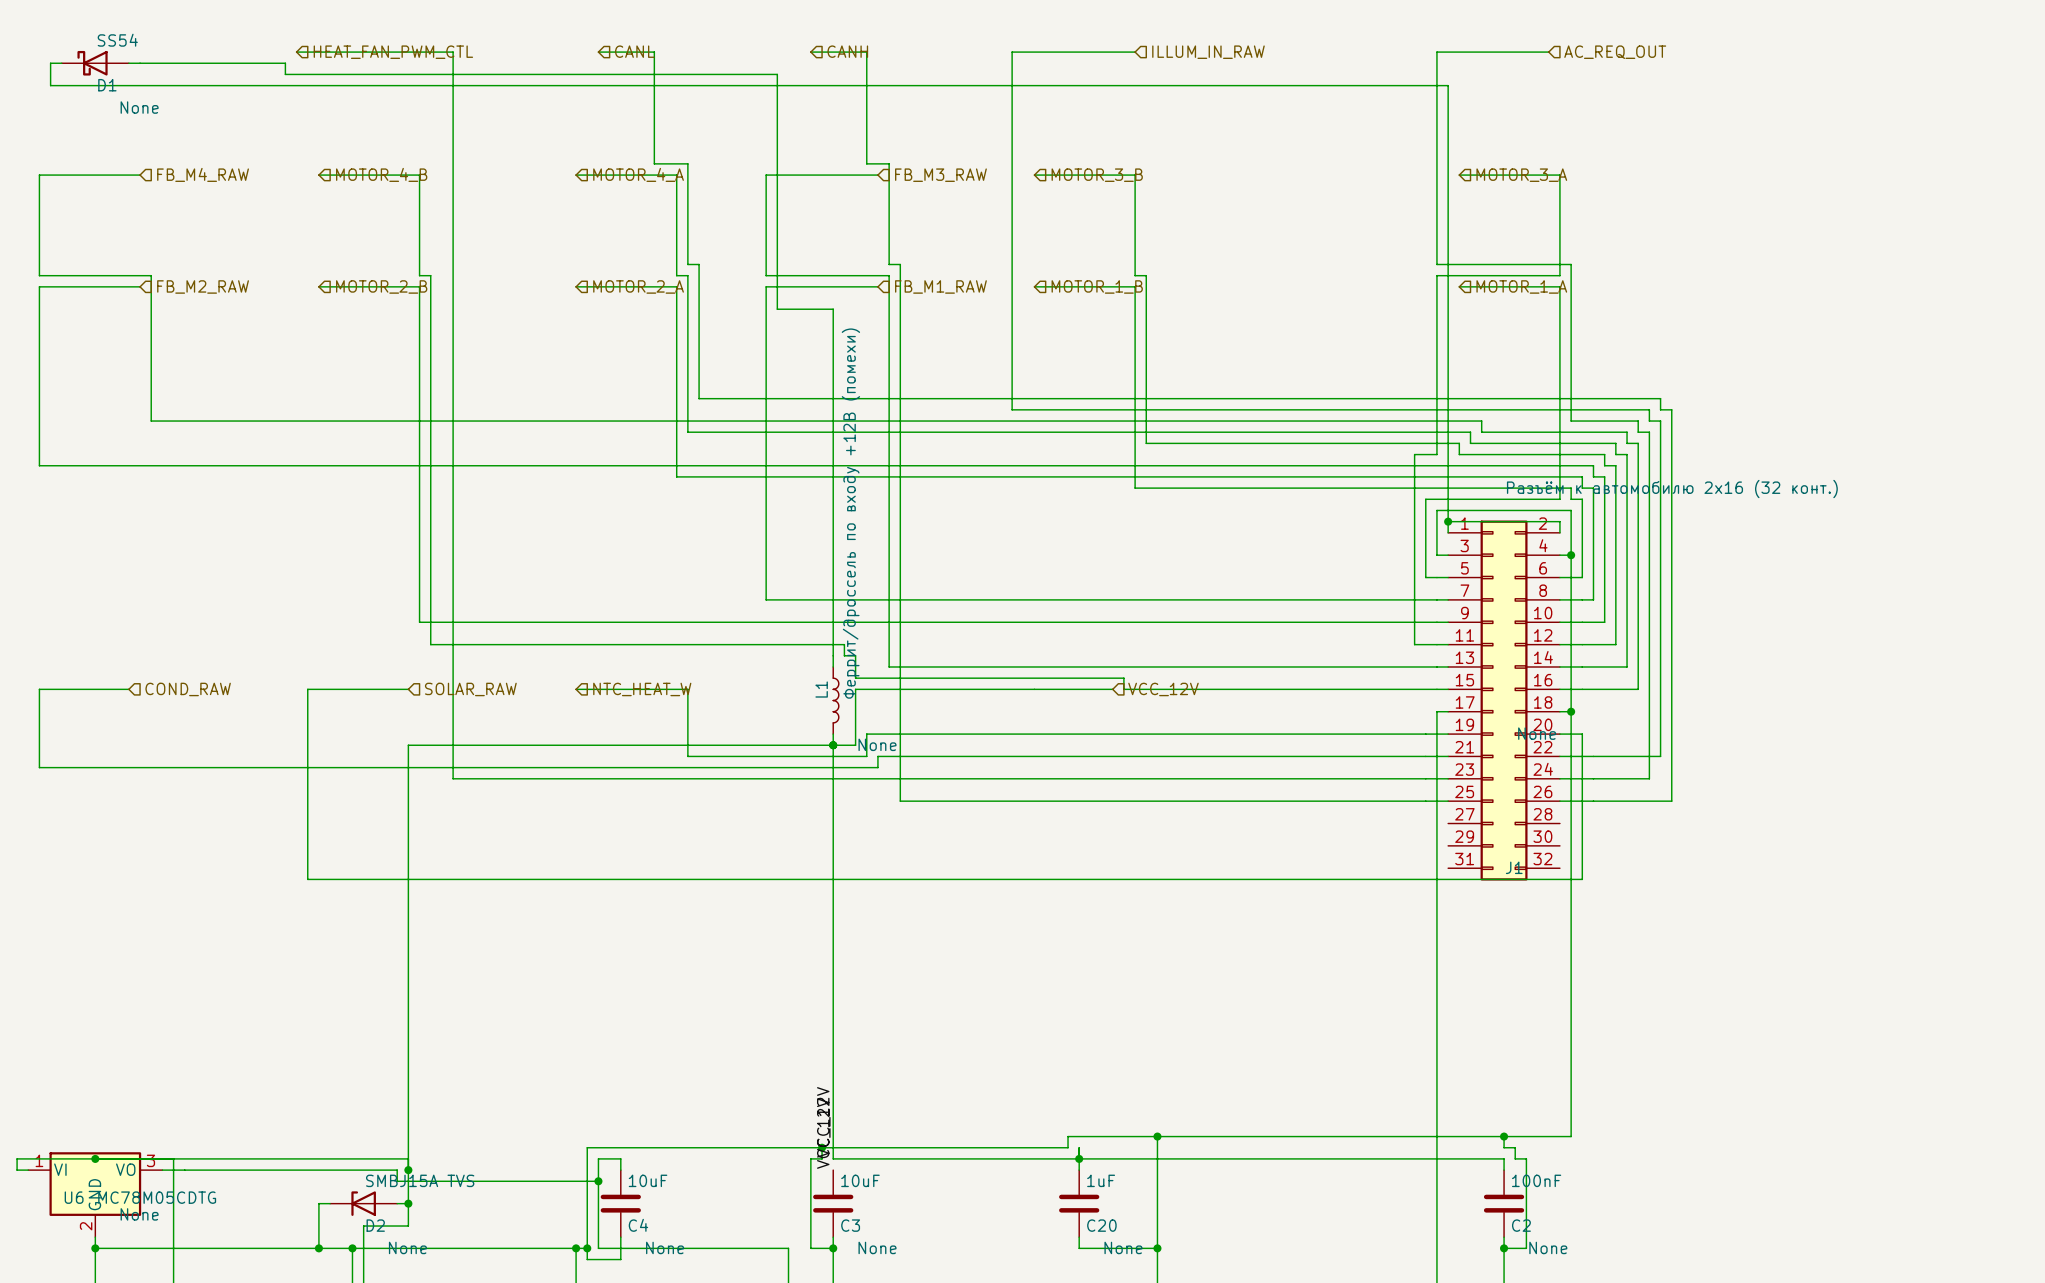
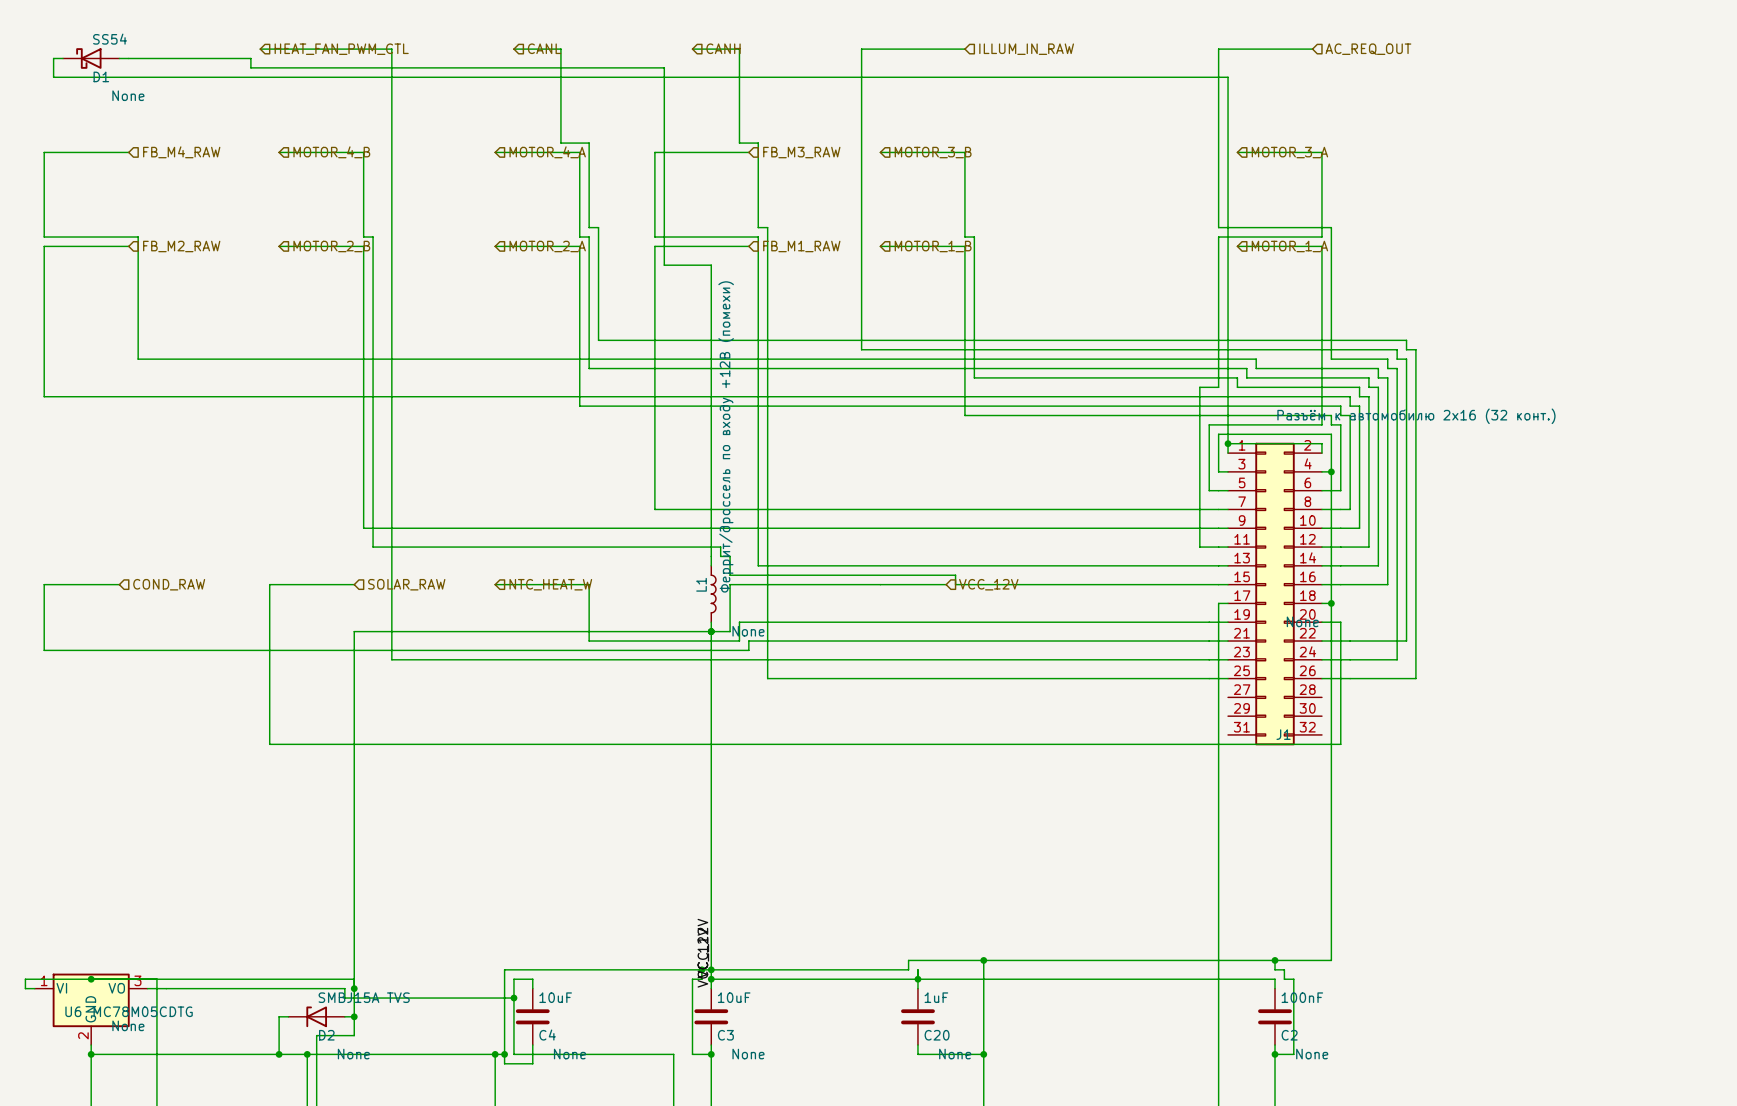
junction: none -> (711, 969)
wire: none -> (711, 979) (711, 988)
junction: none -> (711, 979)

